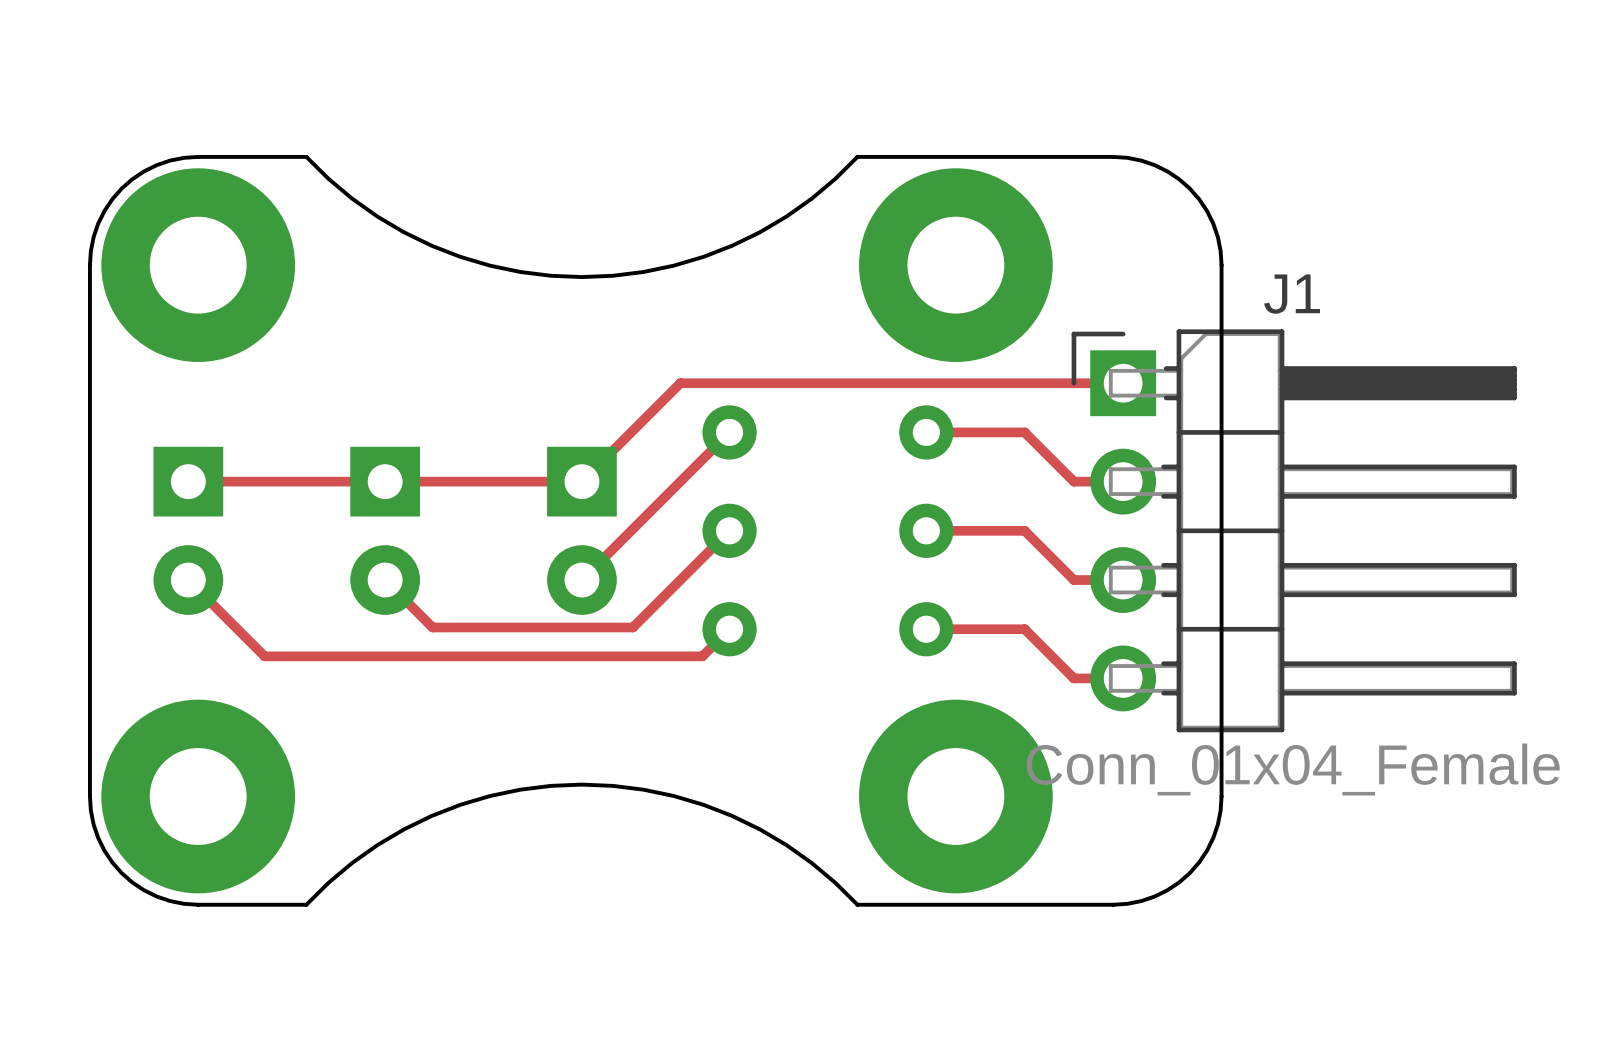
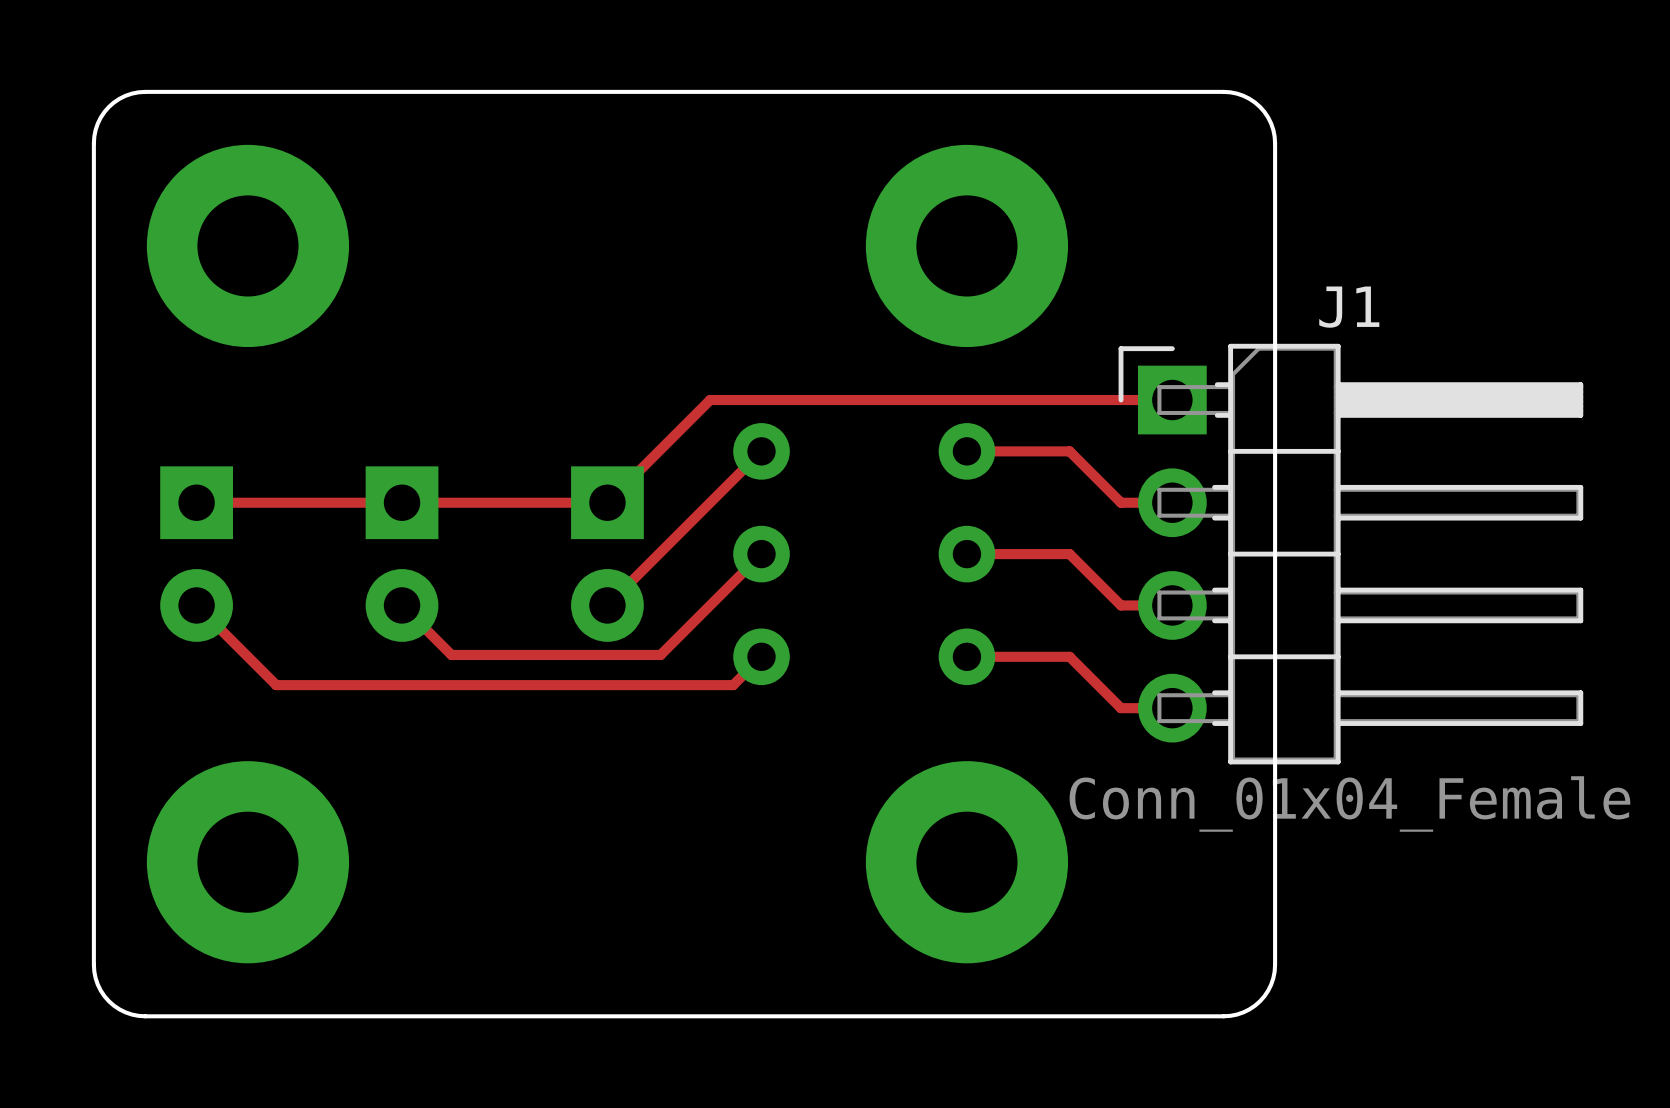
part position: (198, 265) -> (247, 245)
part position: (955, 265) -> (966, 245)
board edge: (1221, 265) (1217, 237) (1213, 223) (1199, 199) (1189, 188) (1179, 179) (1154, 165) (1141, 160) (1113, 156) (857, 156) (811, 198) (786, 216) (732, 245) (673, 265) (643, 271) (581, 277) (551, 275) (490, 265) (431, 245) (377, 216) (352, 198) (306, 156) (184, 157) (156, 165) (144, 171) (132, 179) (112, 199) (98, 223) (90, 251) (89, 265) -> (1275, 276) (1275, 143) (1273, 129) (1268, 117) (1254, 102) (1237, 93) (1223, 91) (138, 92) (125, 95) (113, 102) (104, 111) (95, 129) (93, 143) (93, 276)
part position: (198, 796) -> (247, 862)
part position: (955, 796) -> (966, 862)
board edge: (1221, 796) (1217, 824) (1207, 850) (1199, 862) (1179, 882) (1167, 890) (1141, 901) (1113, 904) (857, 904) (811, 863) (760, 829) (732, 815) (703, 804) (643, 789) (581, 784) (520, 789) (490, 795) (431, 815) (377, 845) (352, 863) (306, 904) (184, 903) (156, 896) (132, 882) (121, 873) (104, 850) (98, 837) (93, 824) (89, 796) -> (1275, 831) (1275, 964) (1273, 978) (1268, 990) (1254, 1005) (1243, 1012) (1223, 1016) (138, 1015) (119, 1009) (108, 1001) (100, 990) (95, 978) (93, 964) (93, 831)

